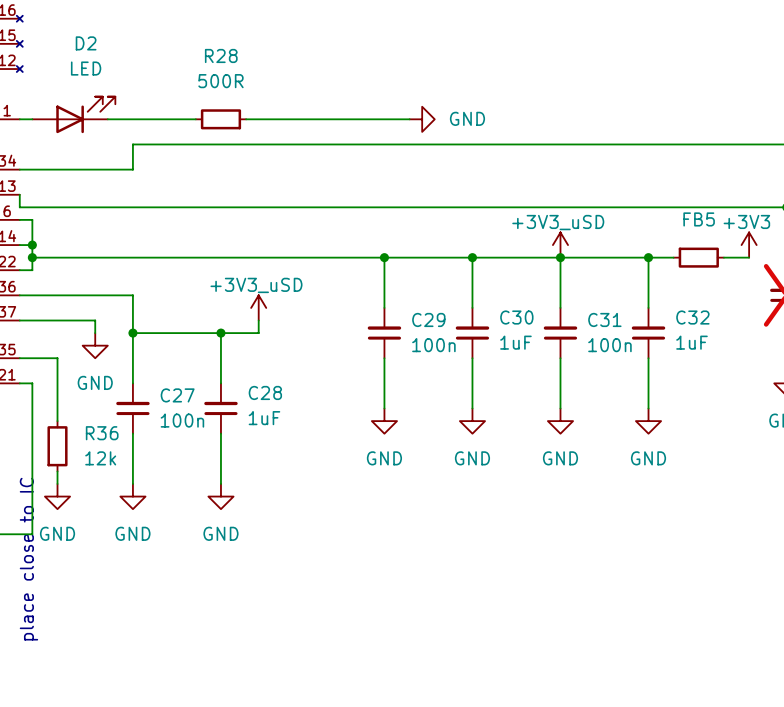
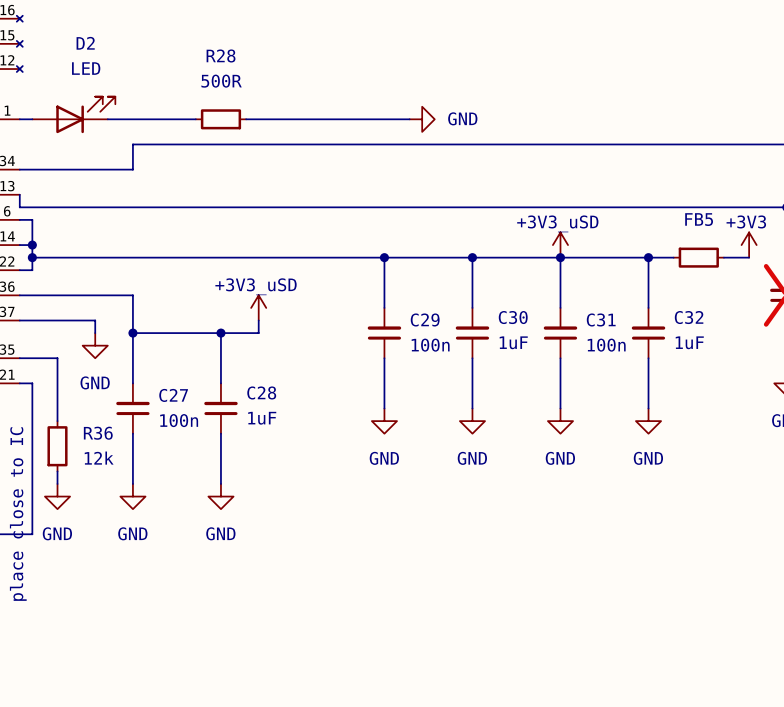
text position: place close to IC (28, 559) -> place close to IC (18, 514)

